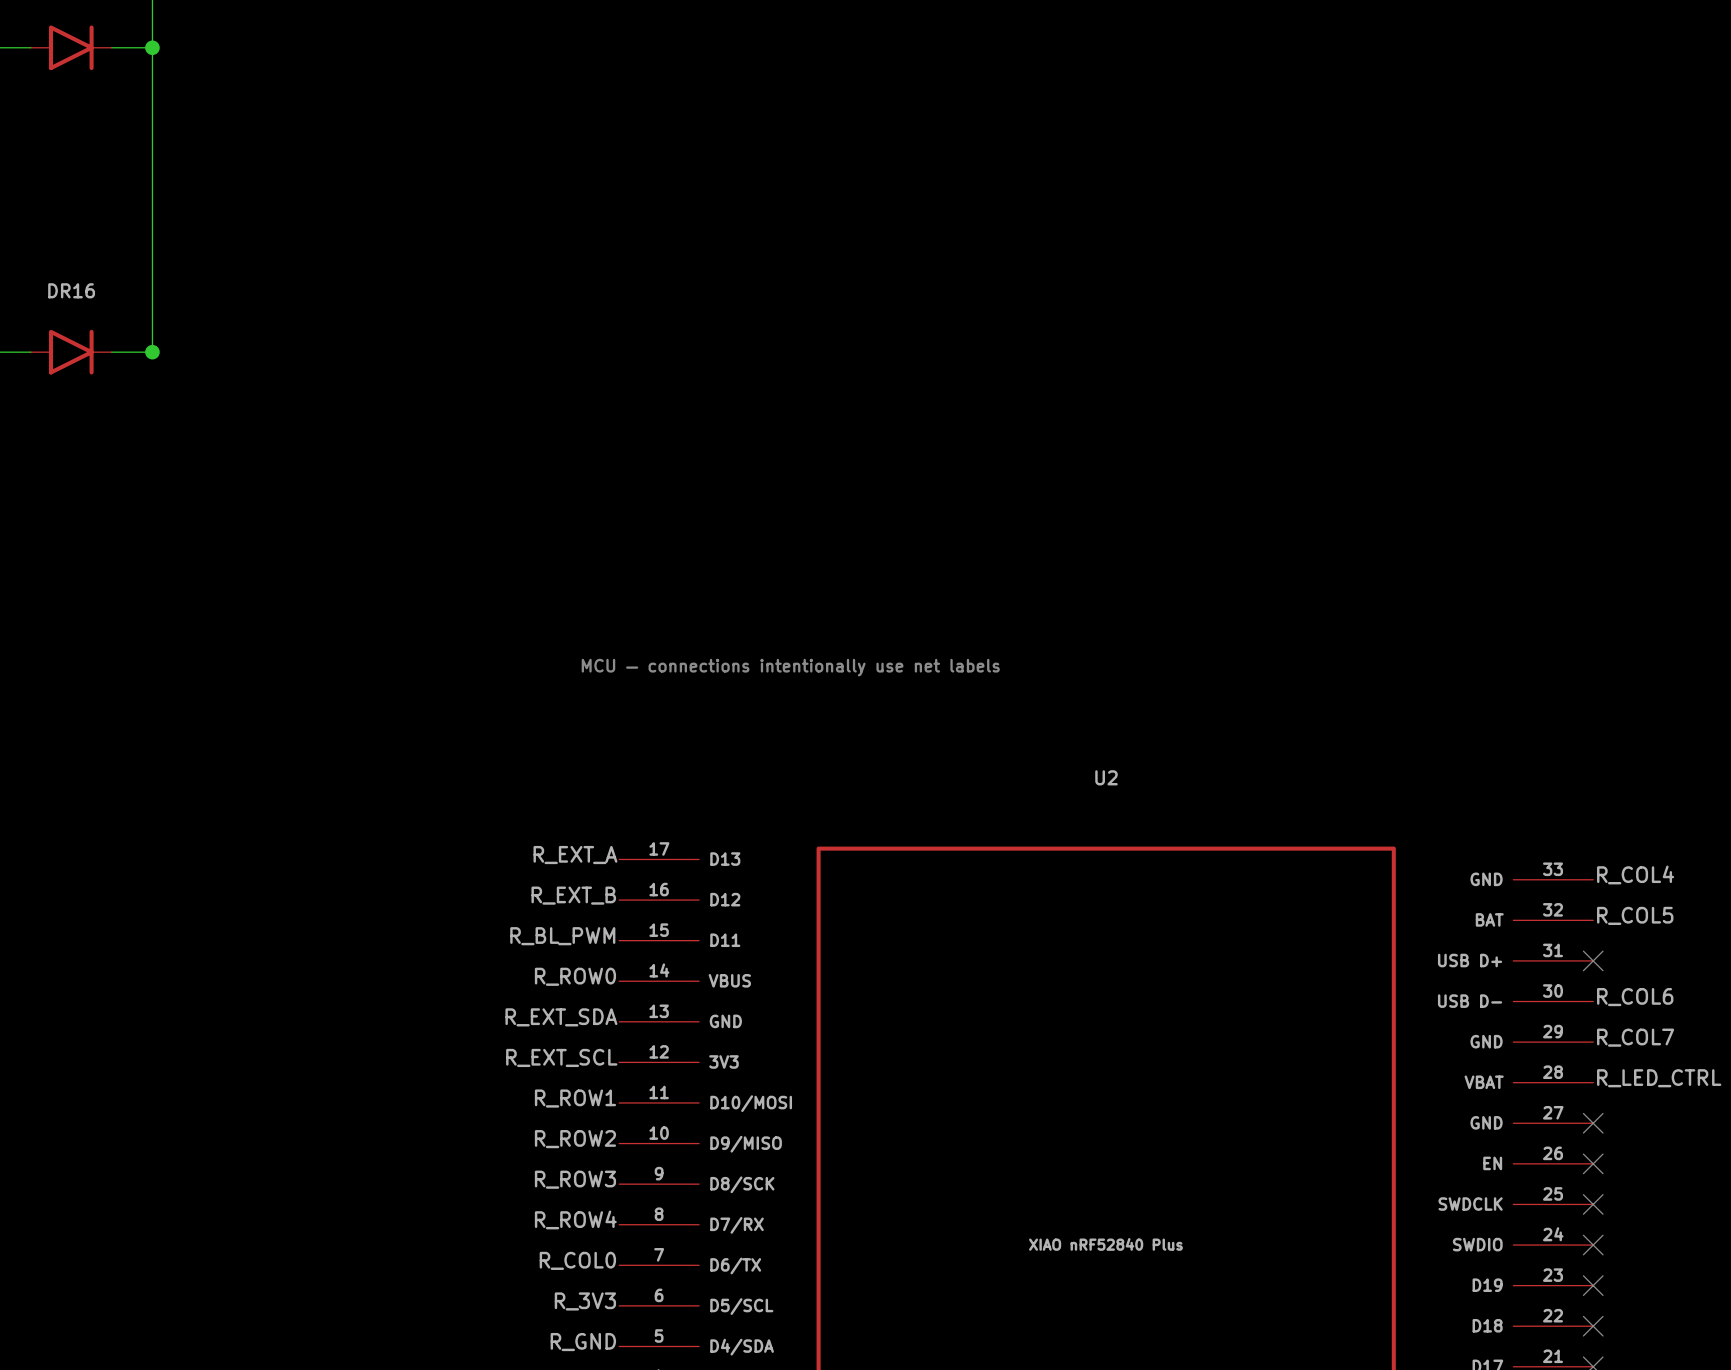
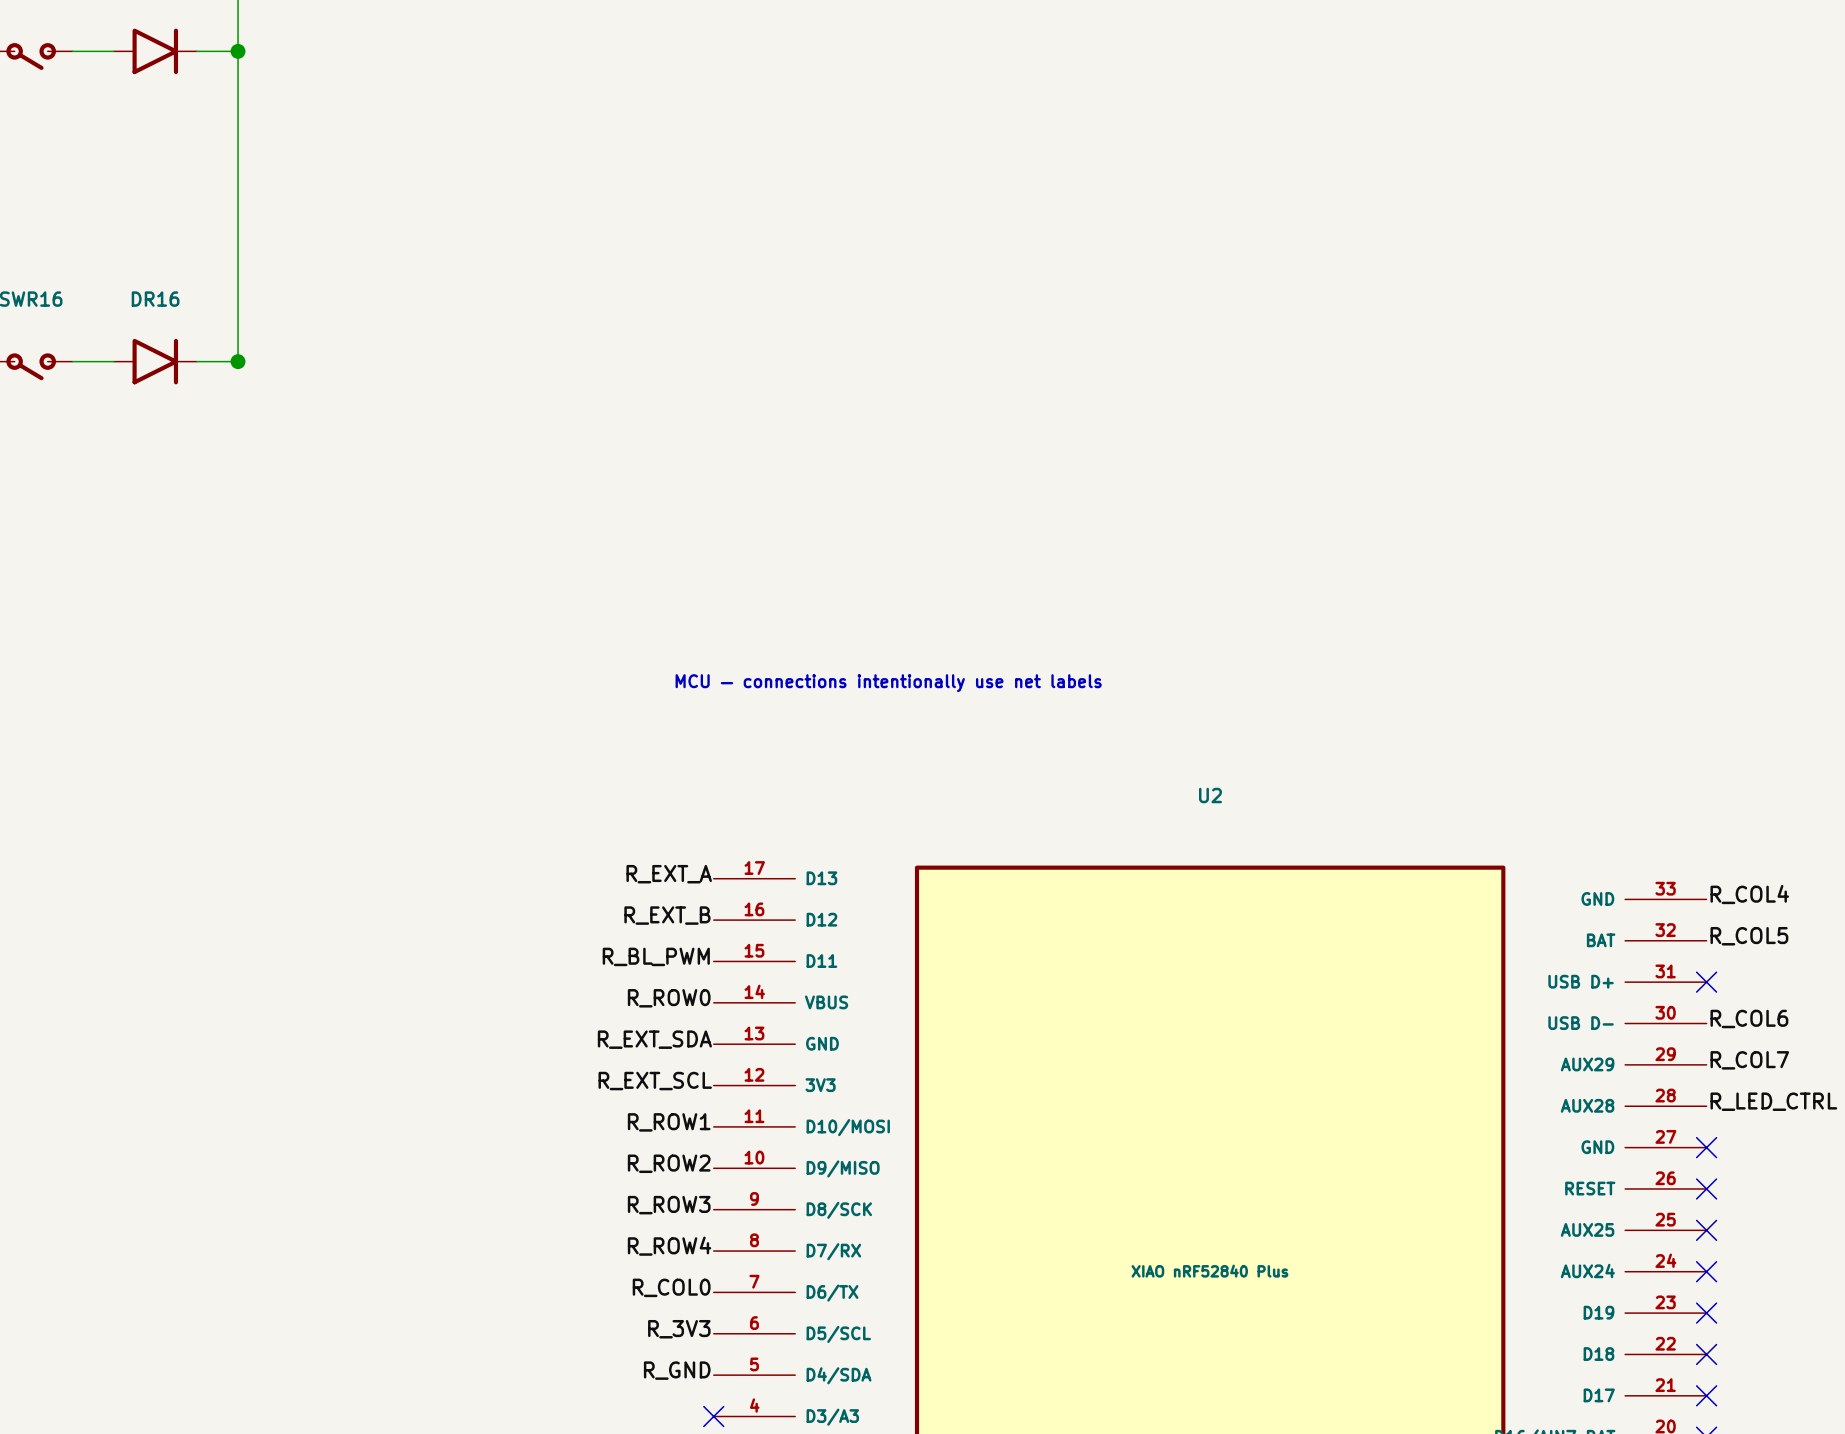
U2 pin name: GND (1486, 1041) -> AUX29 (1587, 1064)
U2 pin name: VBAT (1484, 1082) -> AUX28 (1587, 1105)
U2 pin name: EN (1492, 1163) -> RESET (1590, 1188)
U2 pin name: SWDCLK (1470, 1204) -> AUX25 (1587, 1229)
U2 pin name: SWDIO (1477, 1244) -> AUX24 (1587, 1271)

